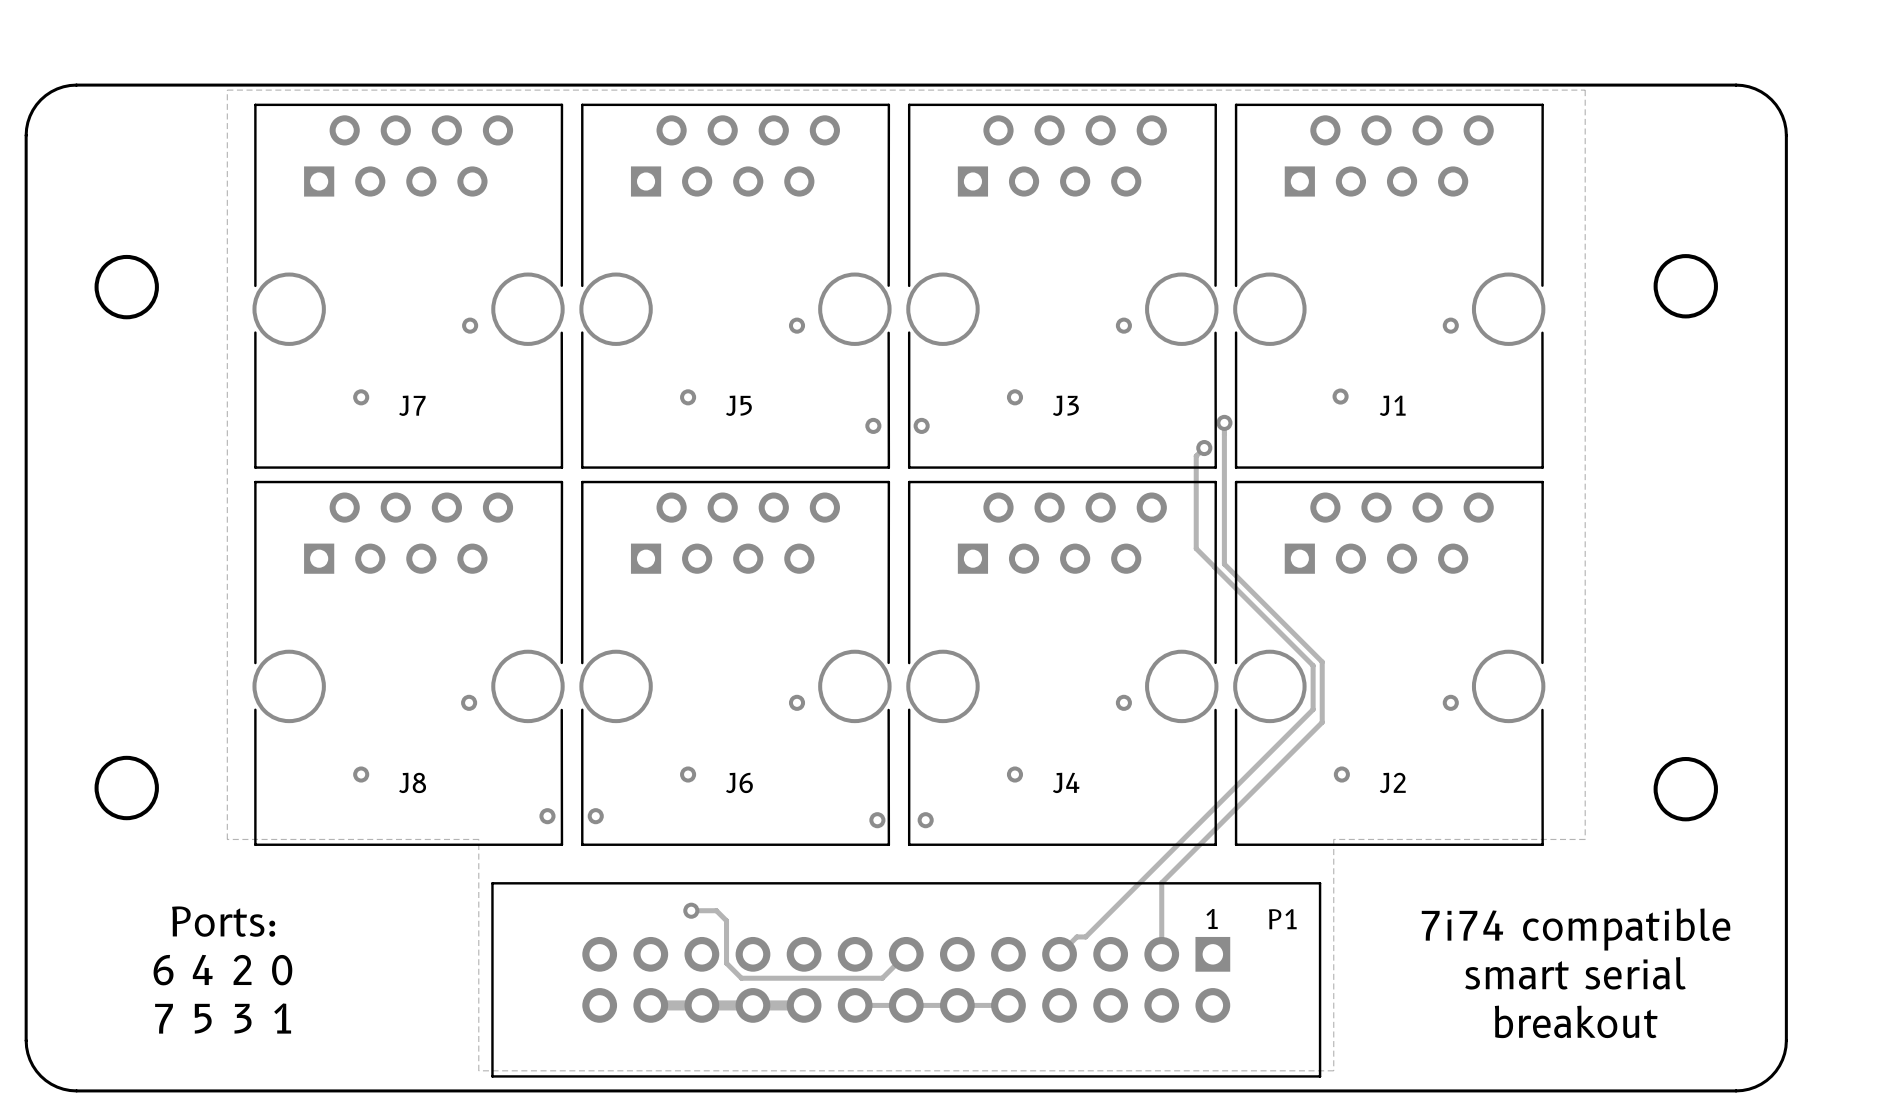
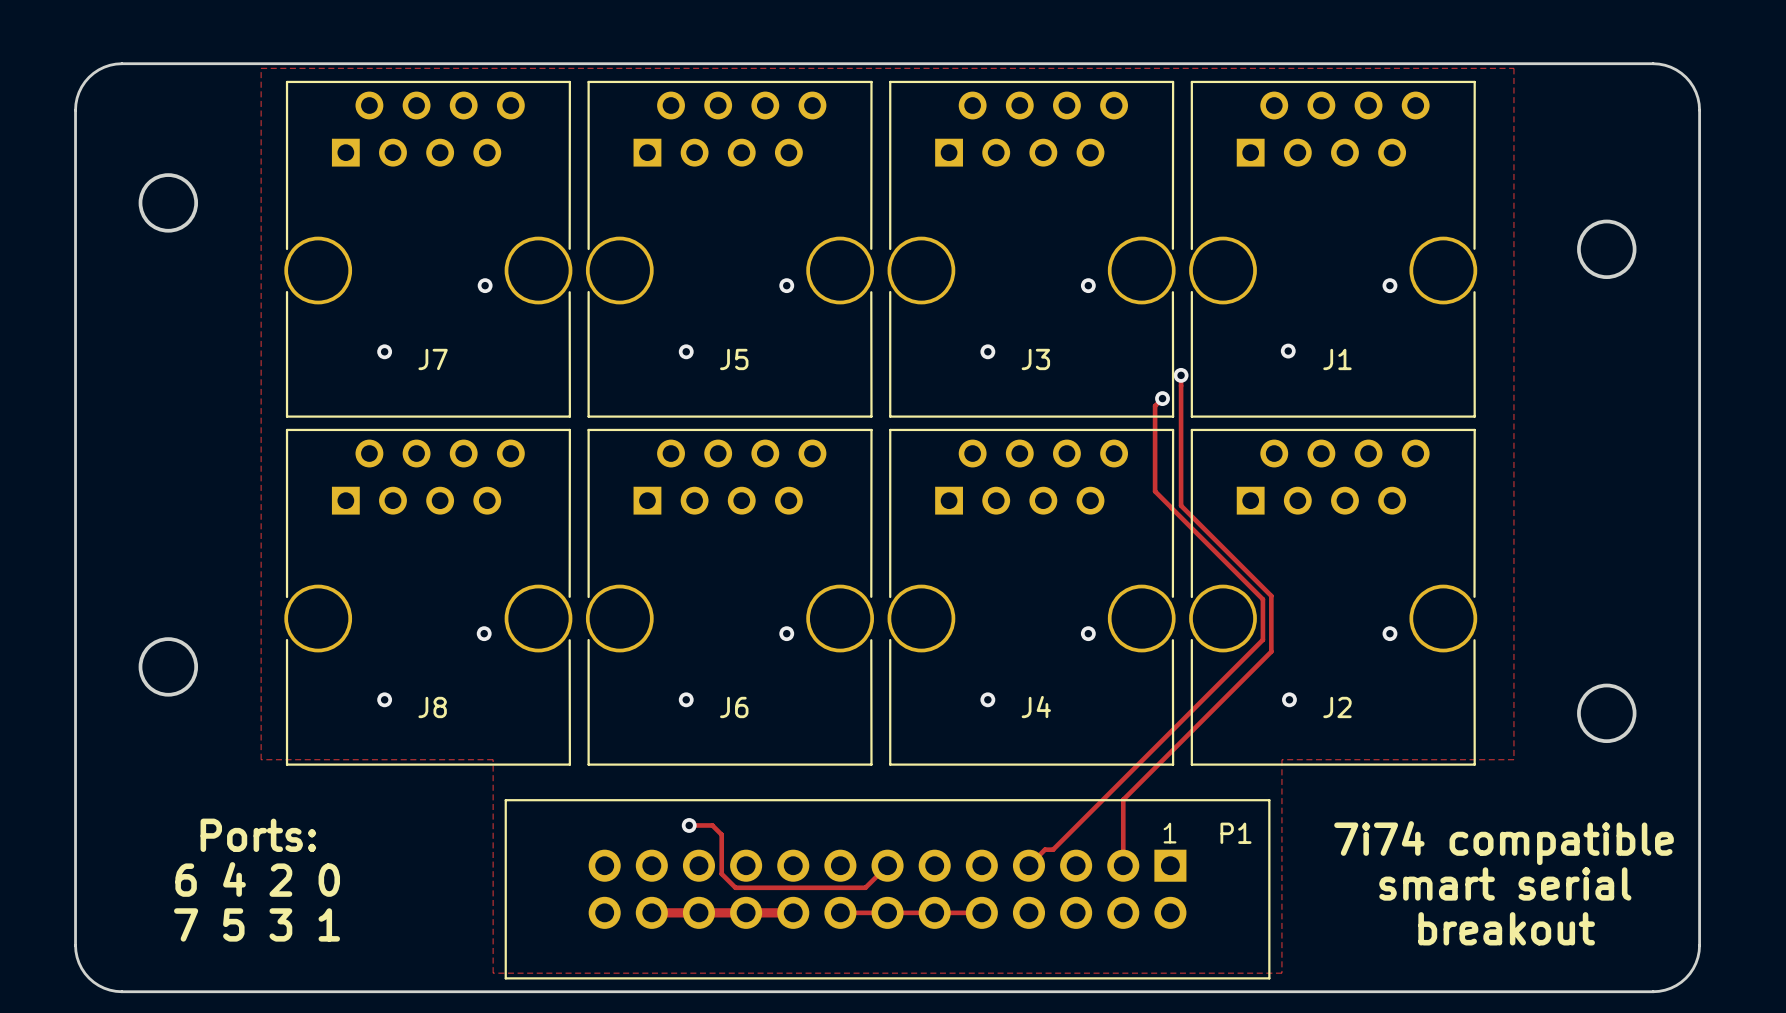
round board edge position: (126, 287) -> (168, 202)
via: (873, 425) -> none
via: (921, 425) -> none
round board edge position: (126, 788) -> (168, 666)
via: (547, 816) -> none
via: (595, 816) -> none
via: (877, 820) -> none
via: (925, 820) -> none

